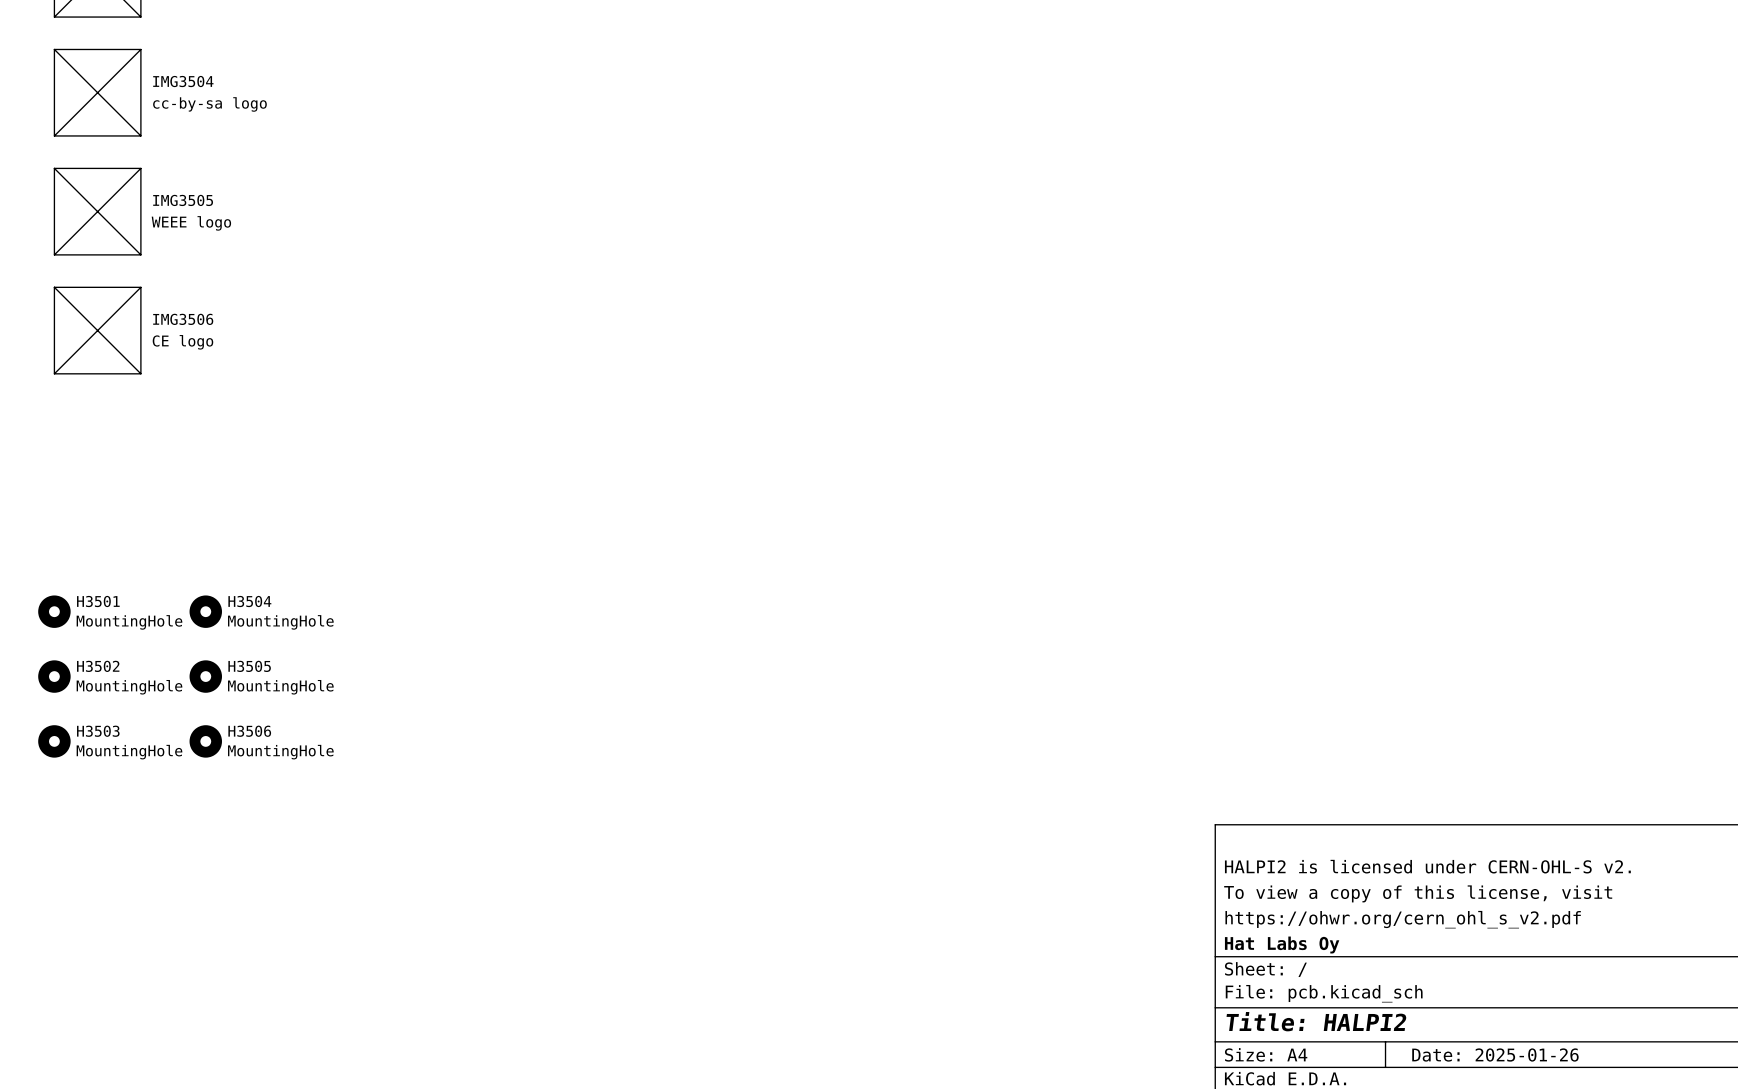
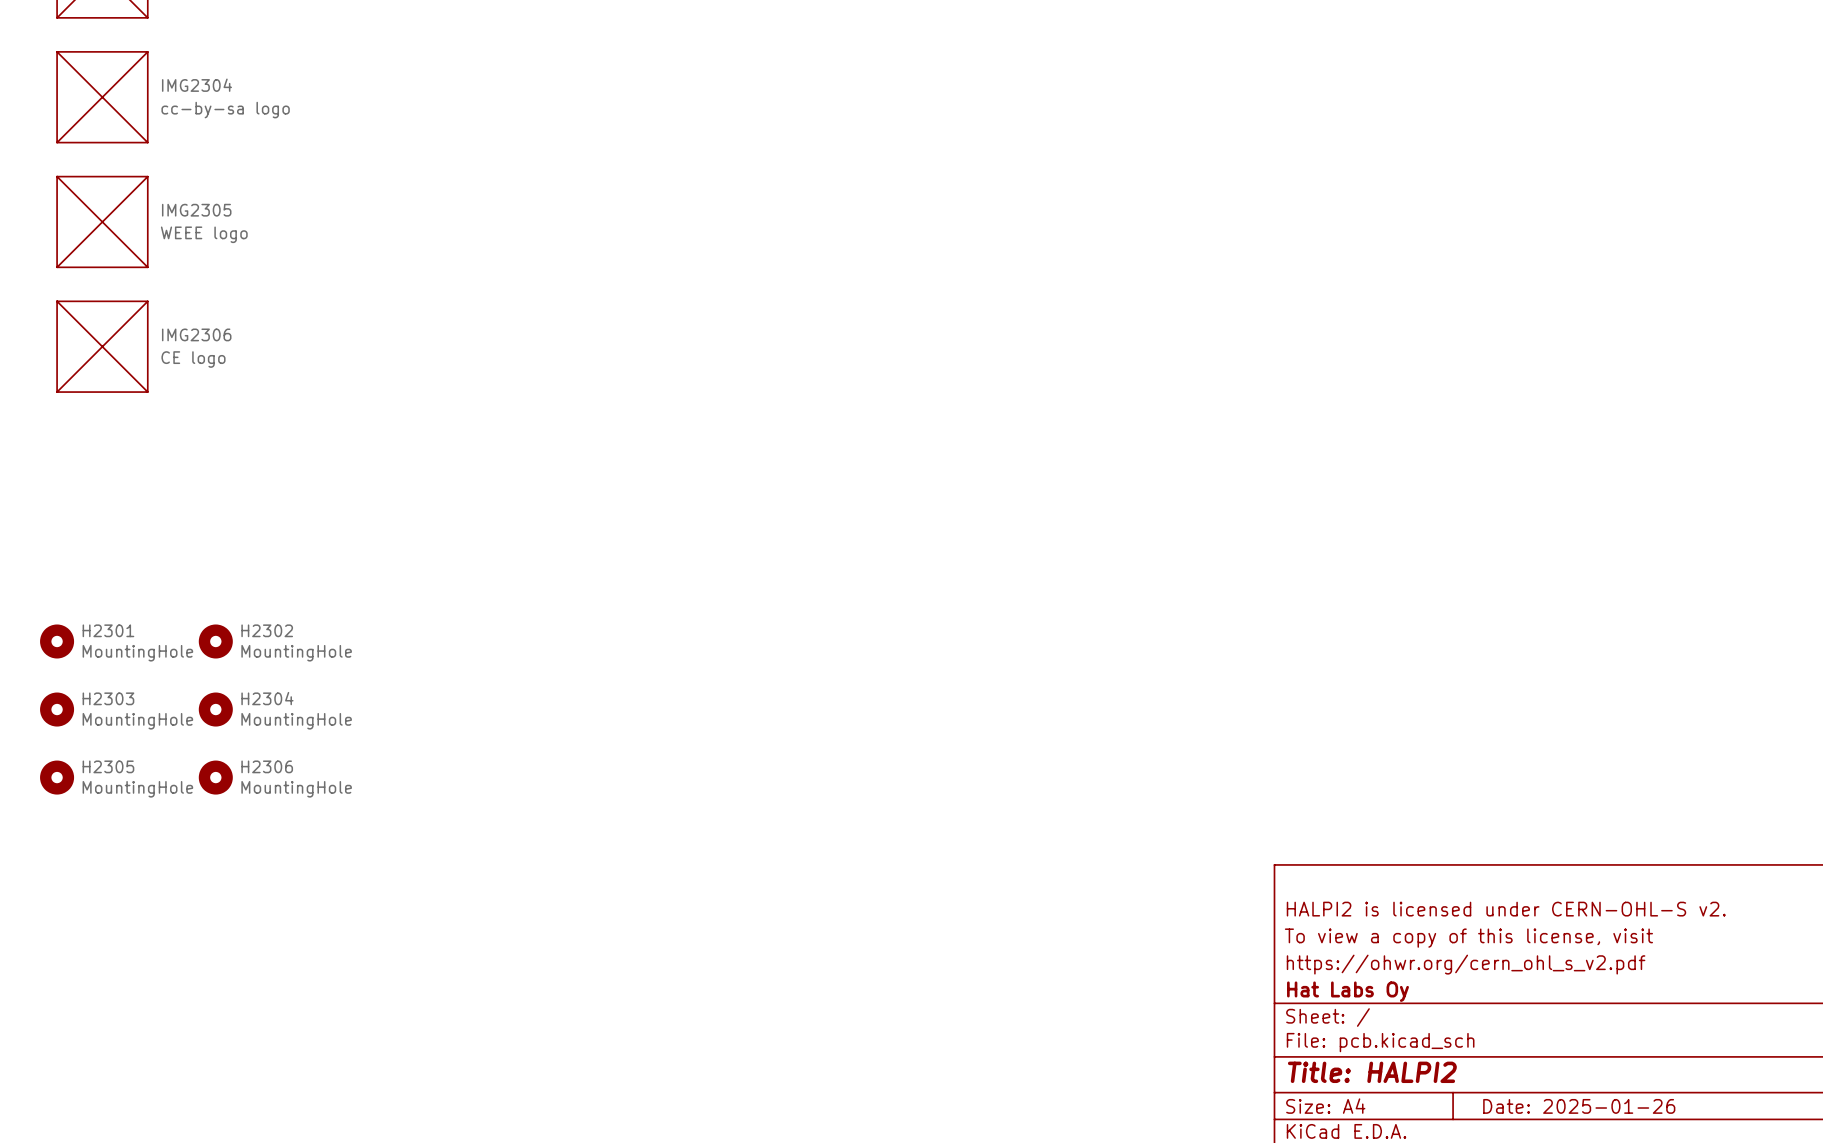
IMG3504 name: IMG3504 (183, 81) -> IMG2304 (196, 85)
IMG3505 name: IMG3505 (183, 200) -> IMG2305 (196, 210)
IMG3506 name: IMG3506 (183, 319) -> IMG2306 (196, 334)
H3501 name: H3501 (98, 601) -> H2301 (108, 630)
H3504 name: H3504 (249, 601) -> H2302 (267, 630)
H3502 name: H3502 (98, 666) -> H2303 (108, 698)
H3505 name: H3505 (249, 666) -> H2304 (267, 698)
H3503 name: H3503 (98, 731) -> H2305 (108, 766)
H3506 name: H3506 (249, 731) -> H2306 (267, 766)

